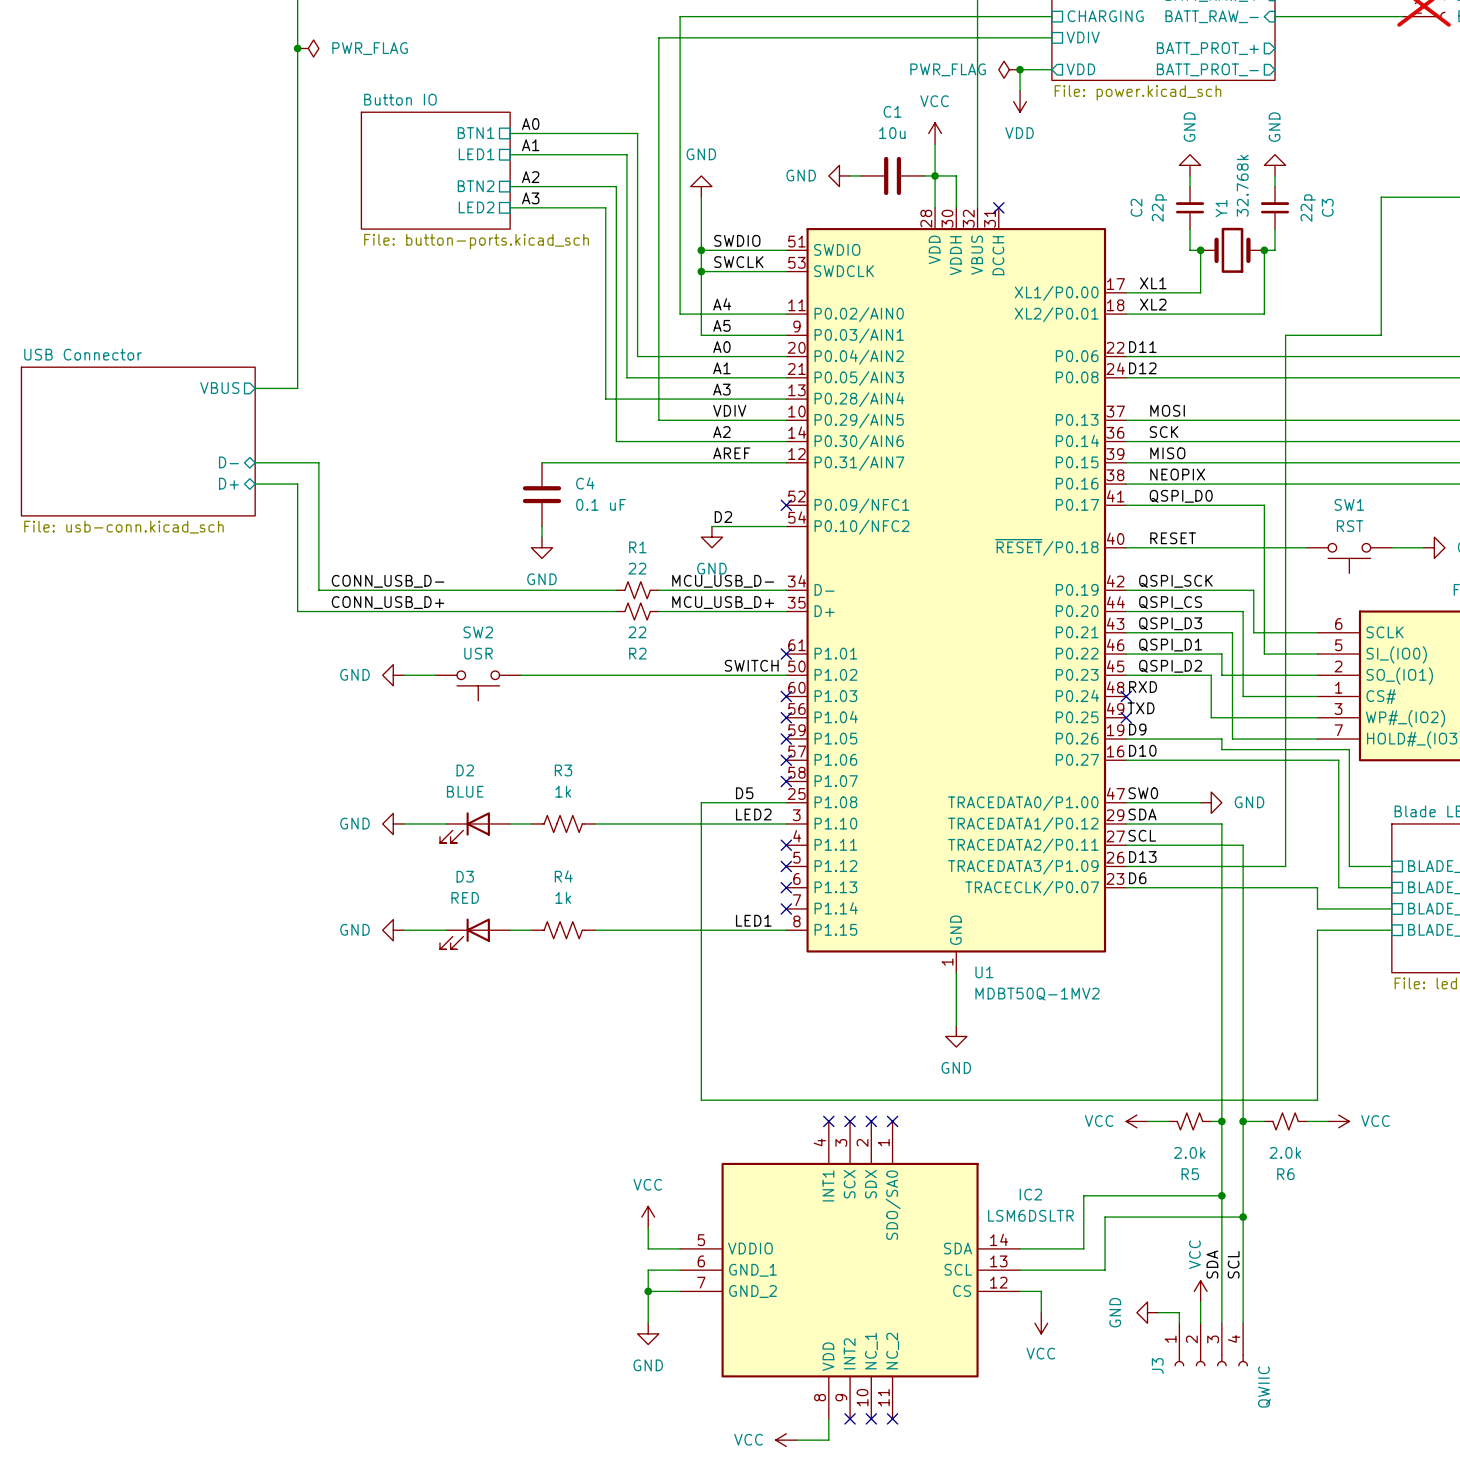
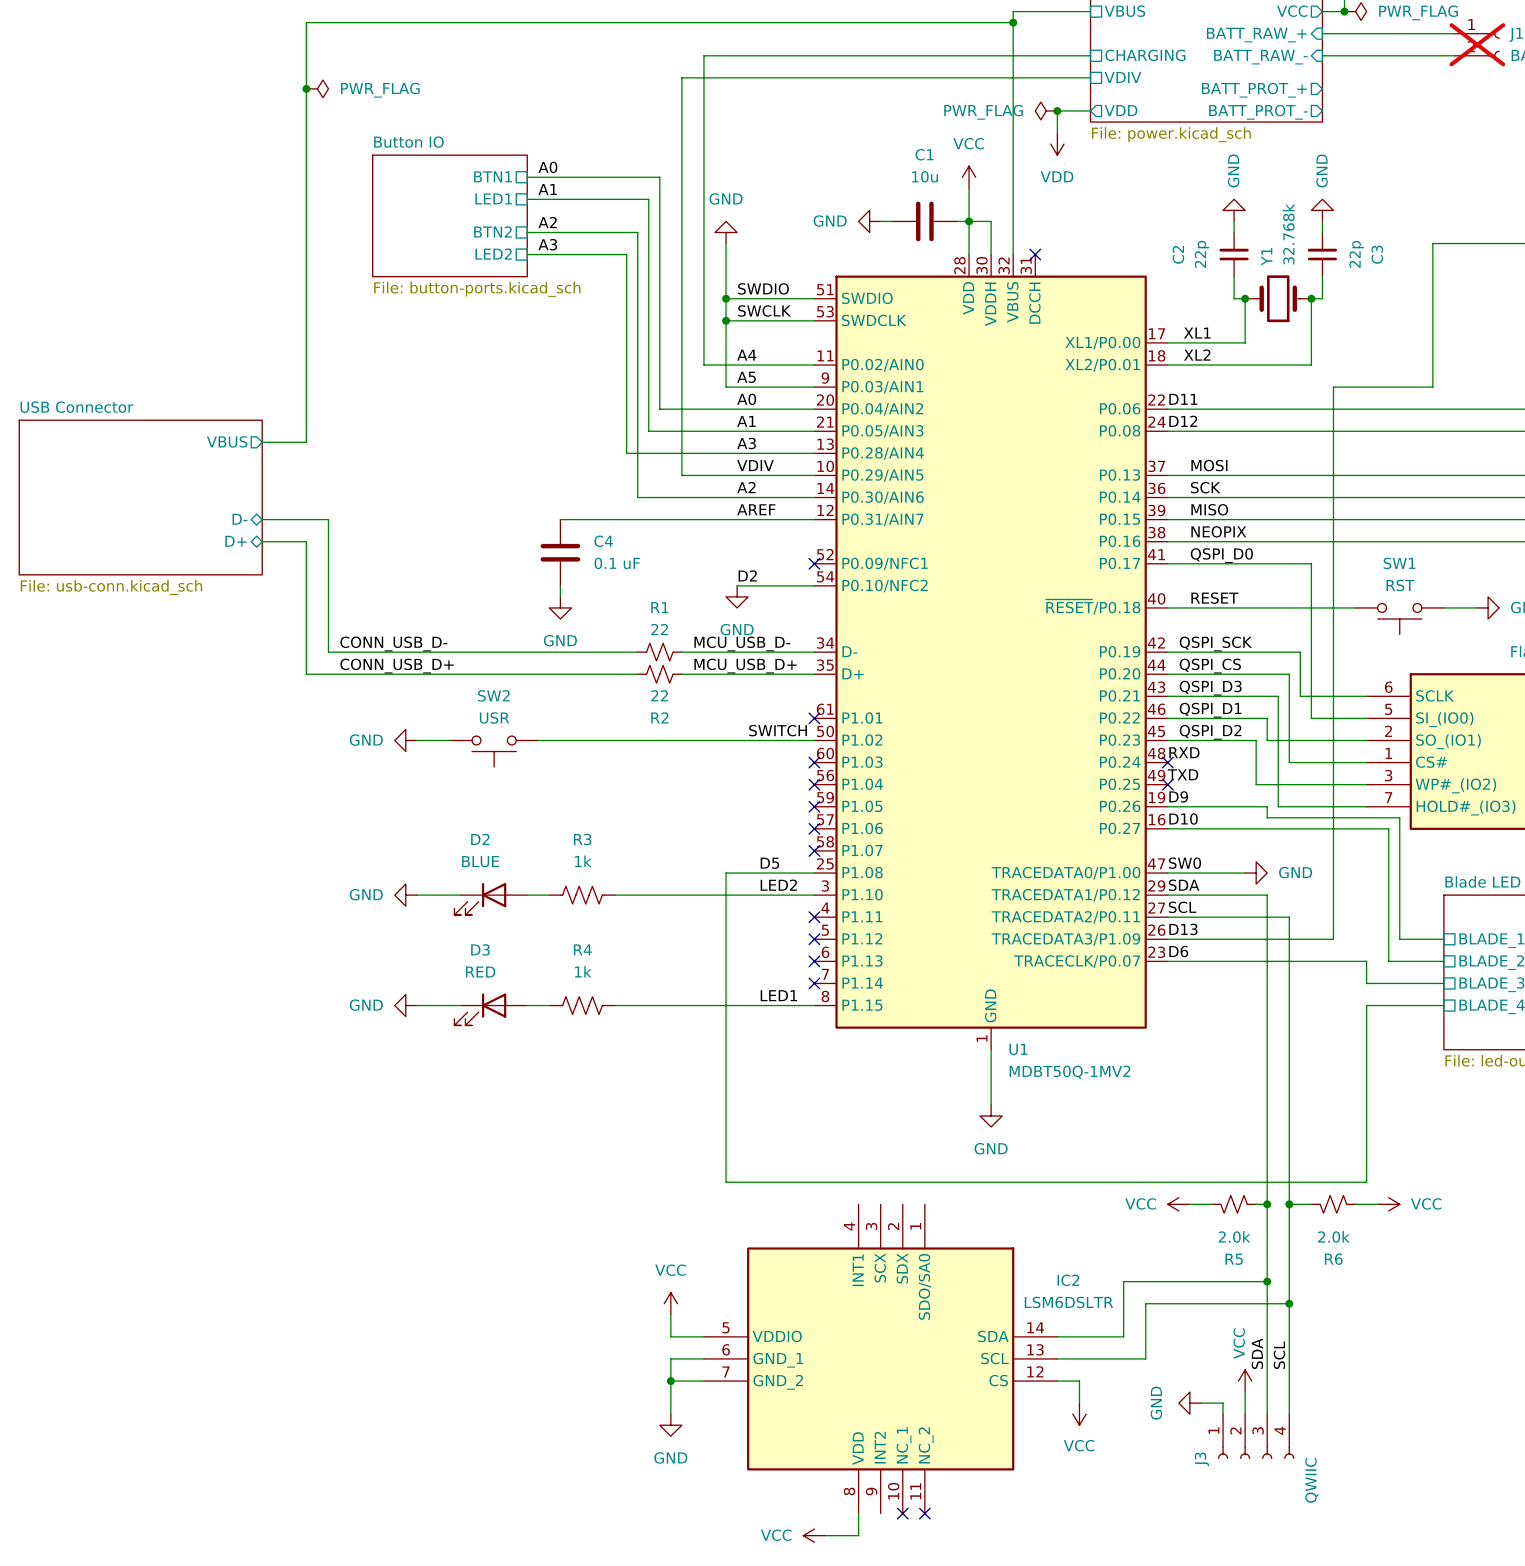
no-connect mark: (828, 1121) -> none
no-connect mark: (850, 1121) -> none
no-connect mark: (871, 1121) -> none
no-connect mark: (892, 1121) -> none
no-connect mark: (850, 1418) -> none

